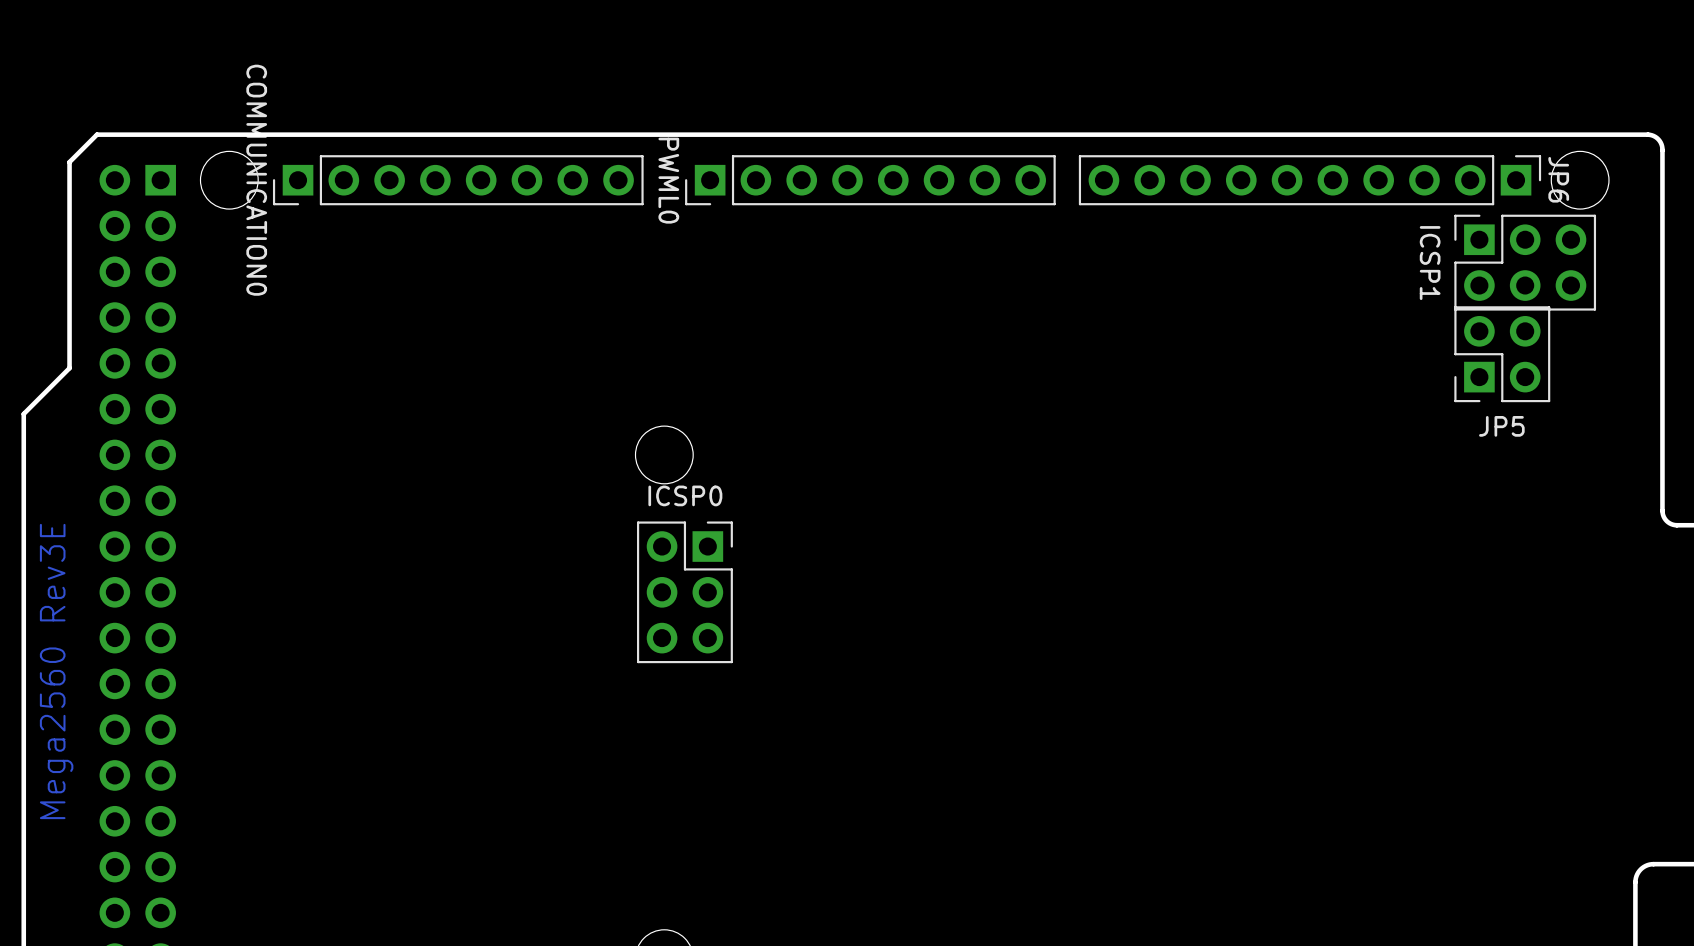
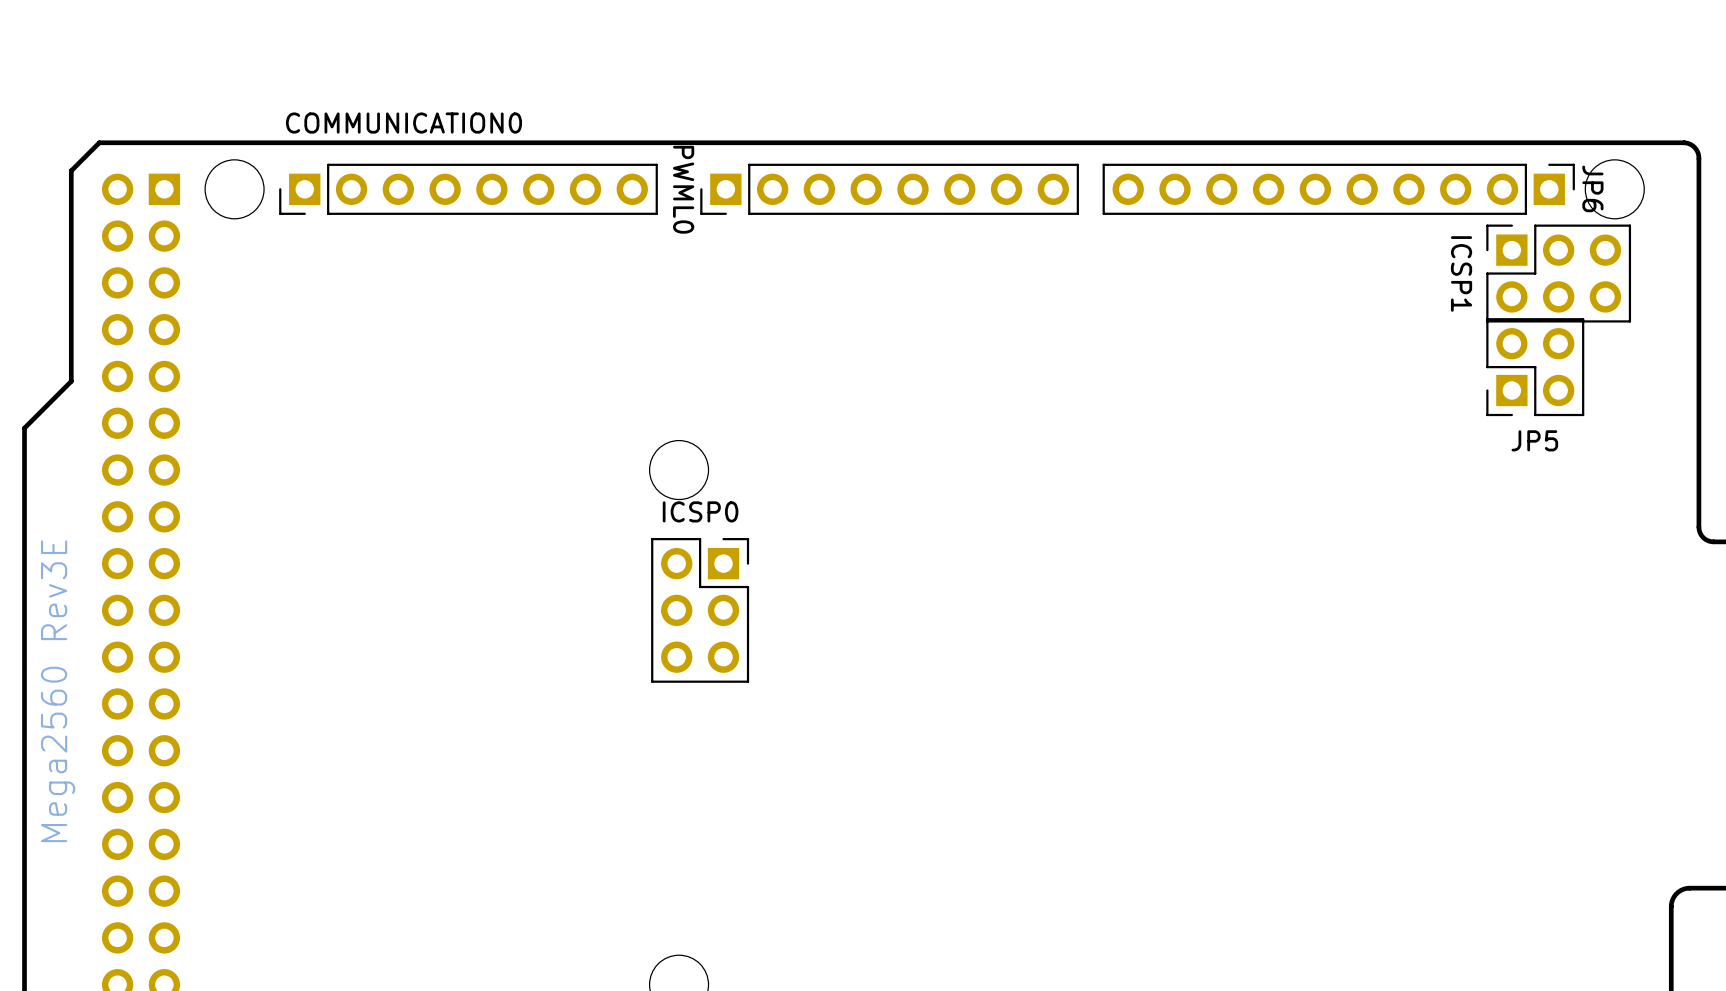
COMMUNICATION0 name rotation: 0° (256, 180) -> 90° counterclockwise (403, 123)

